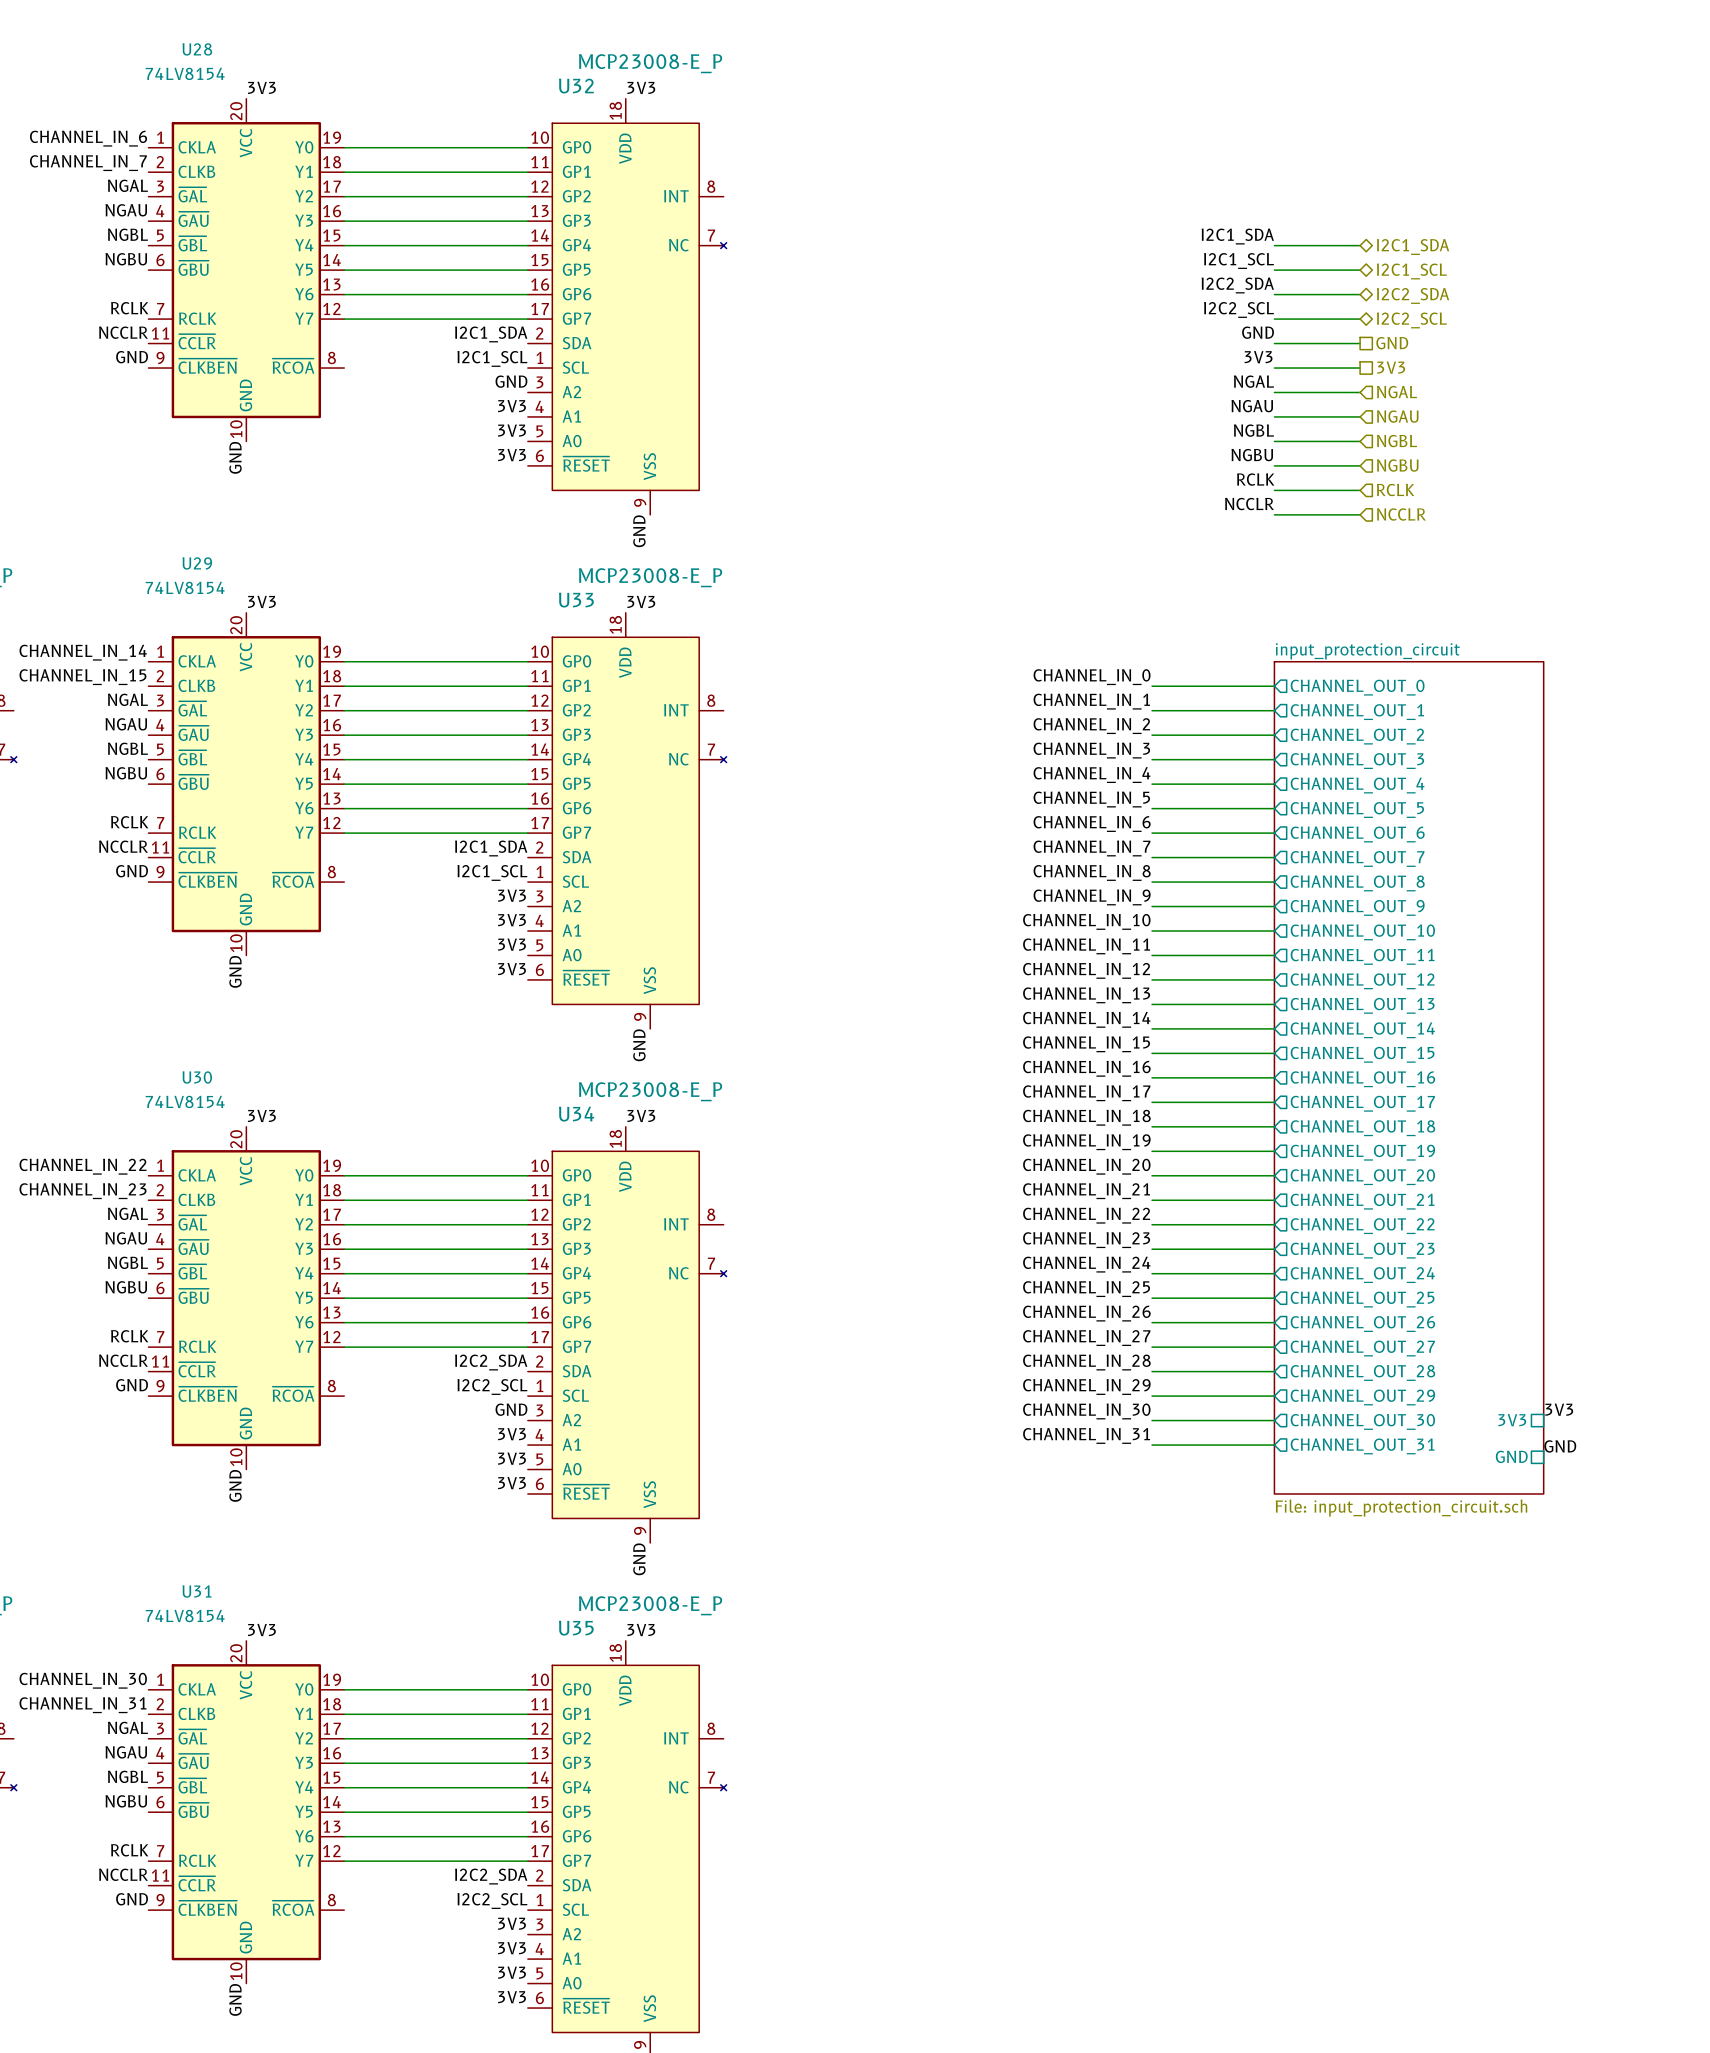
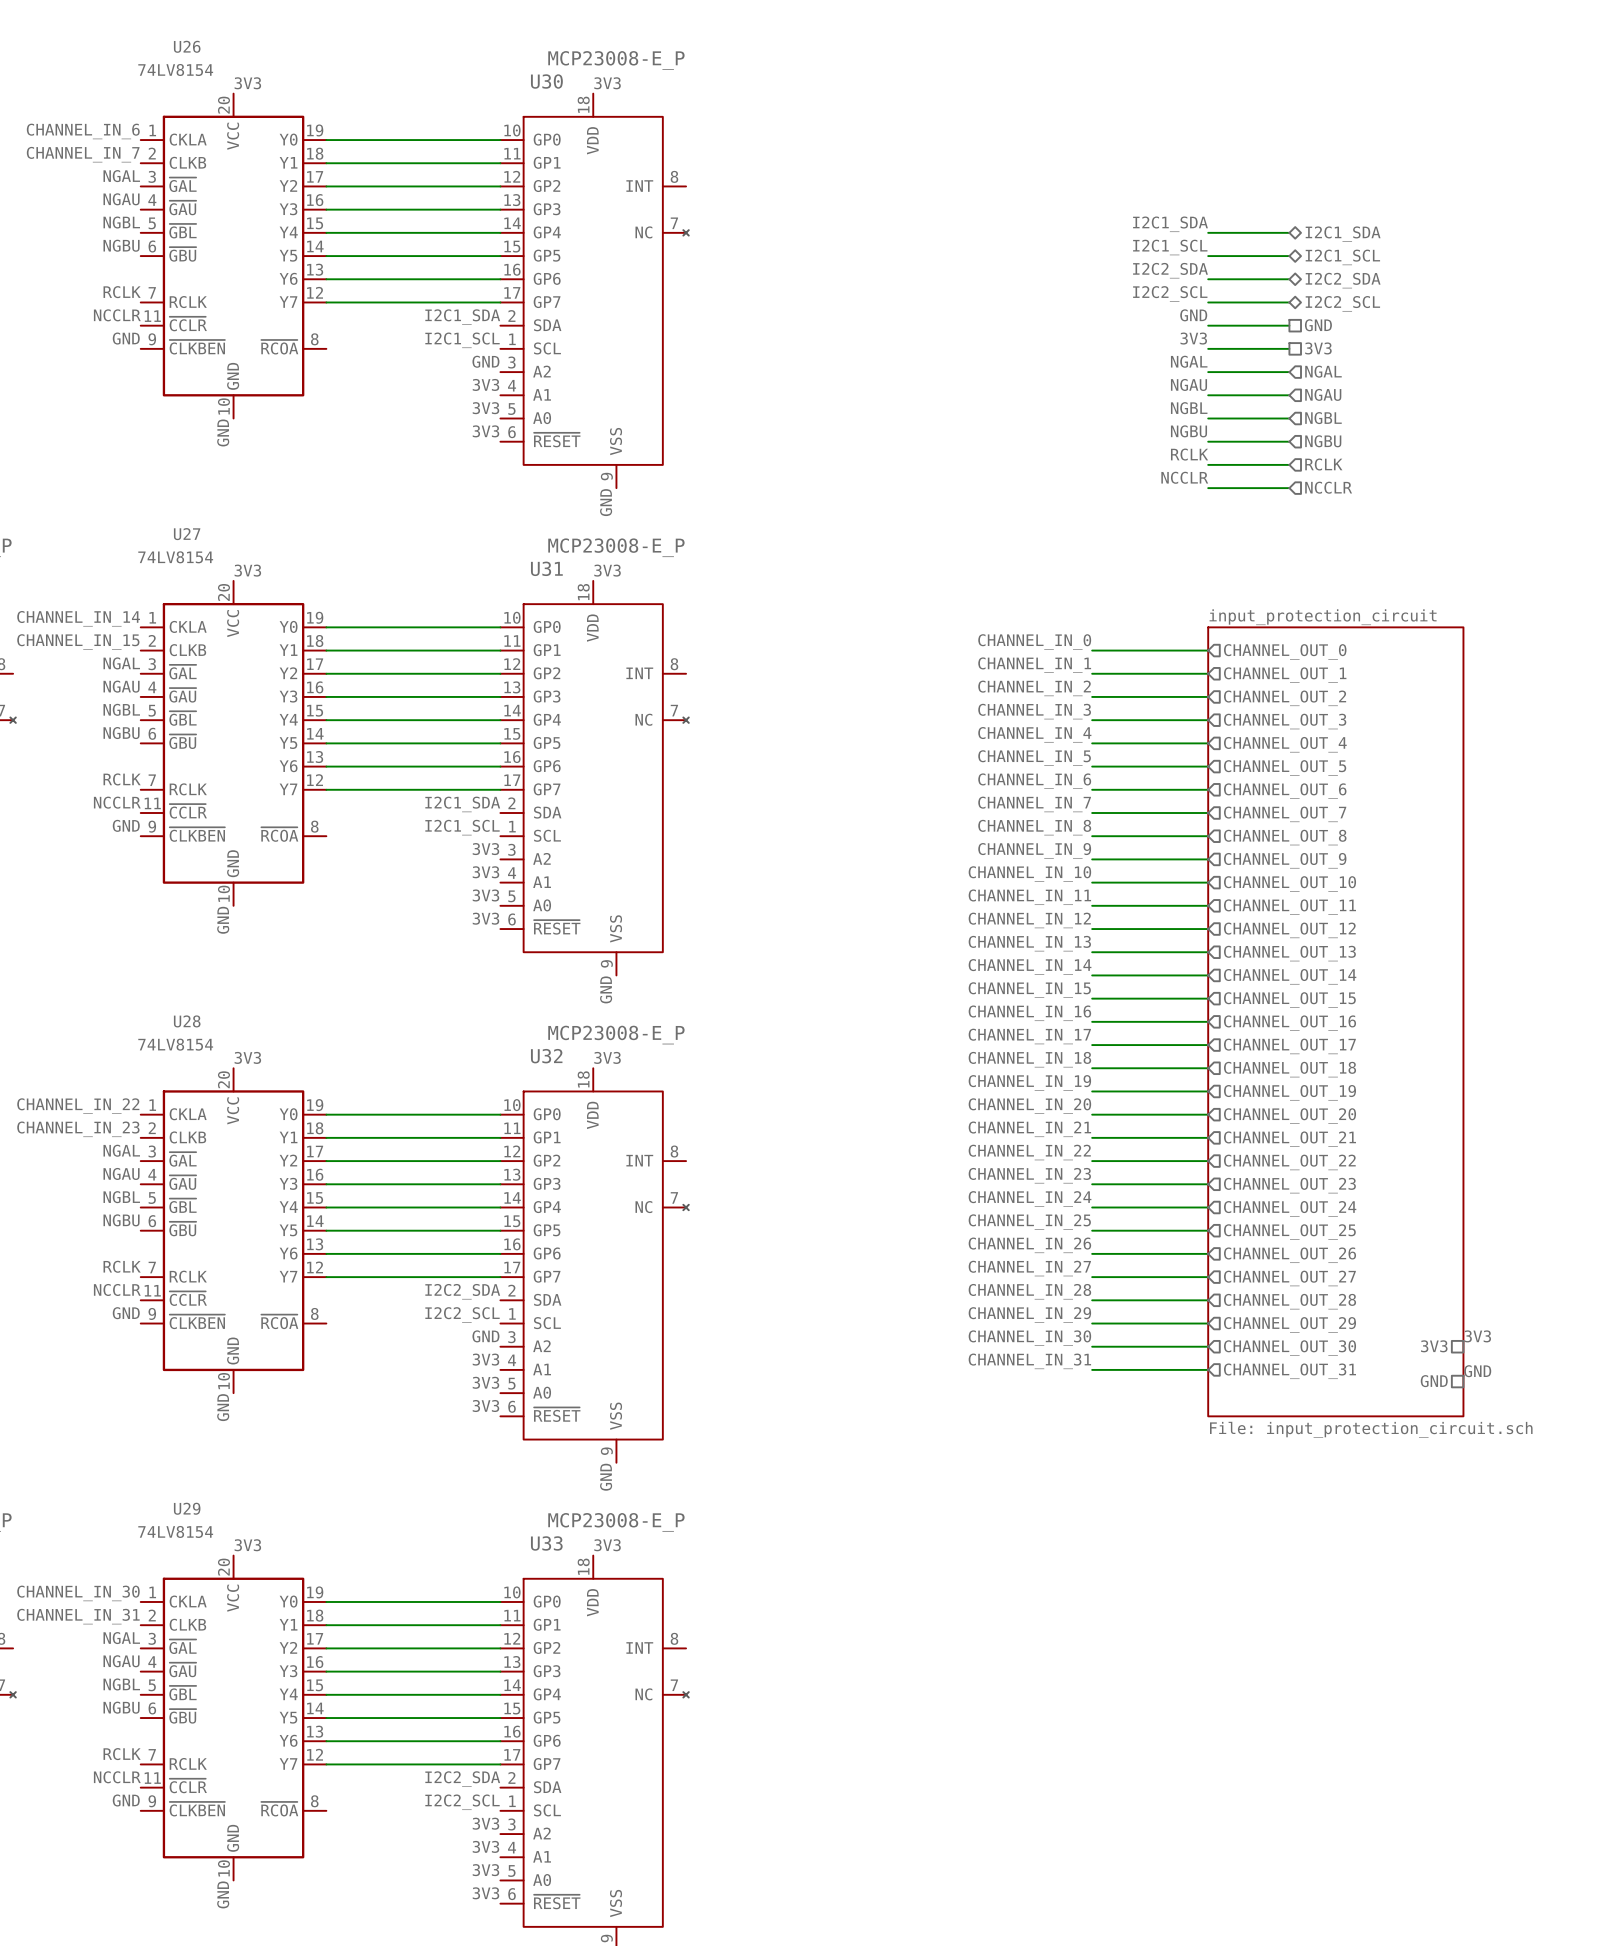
U28 name: U28 (197, 49) -> U26 (187, 46)
U32 name: U32 (576, 86) -> U30 (546, 81)
U29 name: U29 (197, 563) -> U27 (187, 534)
U33 name: U33 (576, 600) -> U31 (546, 568)
U30 name: U30 (197, 1077) -> U28 (187, 1021)
U34 name: U34 (576, 1114) -> U32 (546, 1056)
U31 name: U31 (197, 1591) -> U29 (187, 1508)
U35 name: U35 (576, 1628) -> U33 (546, 1543)

